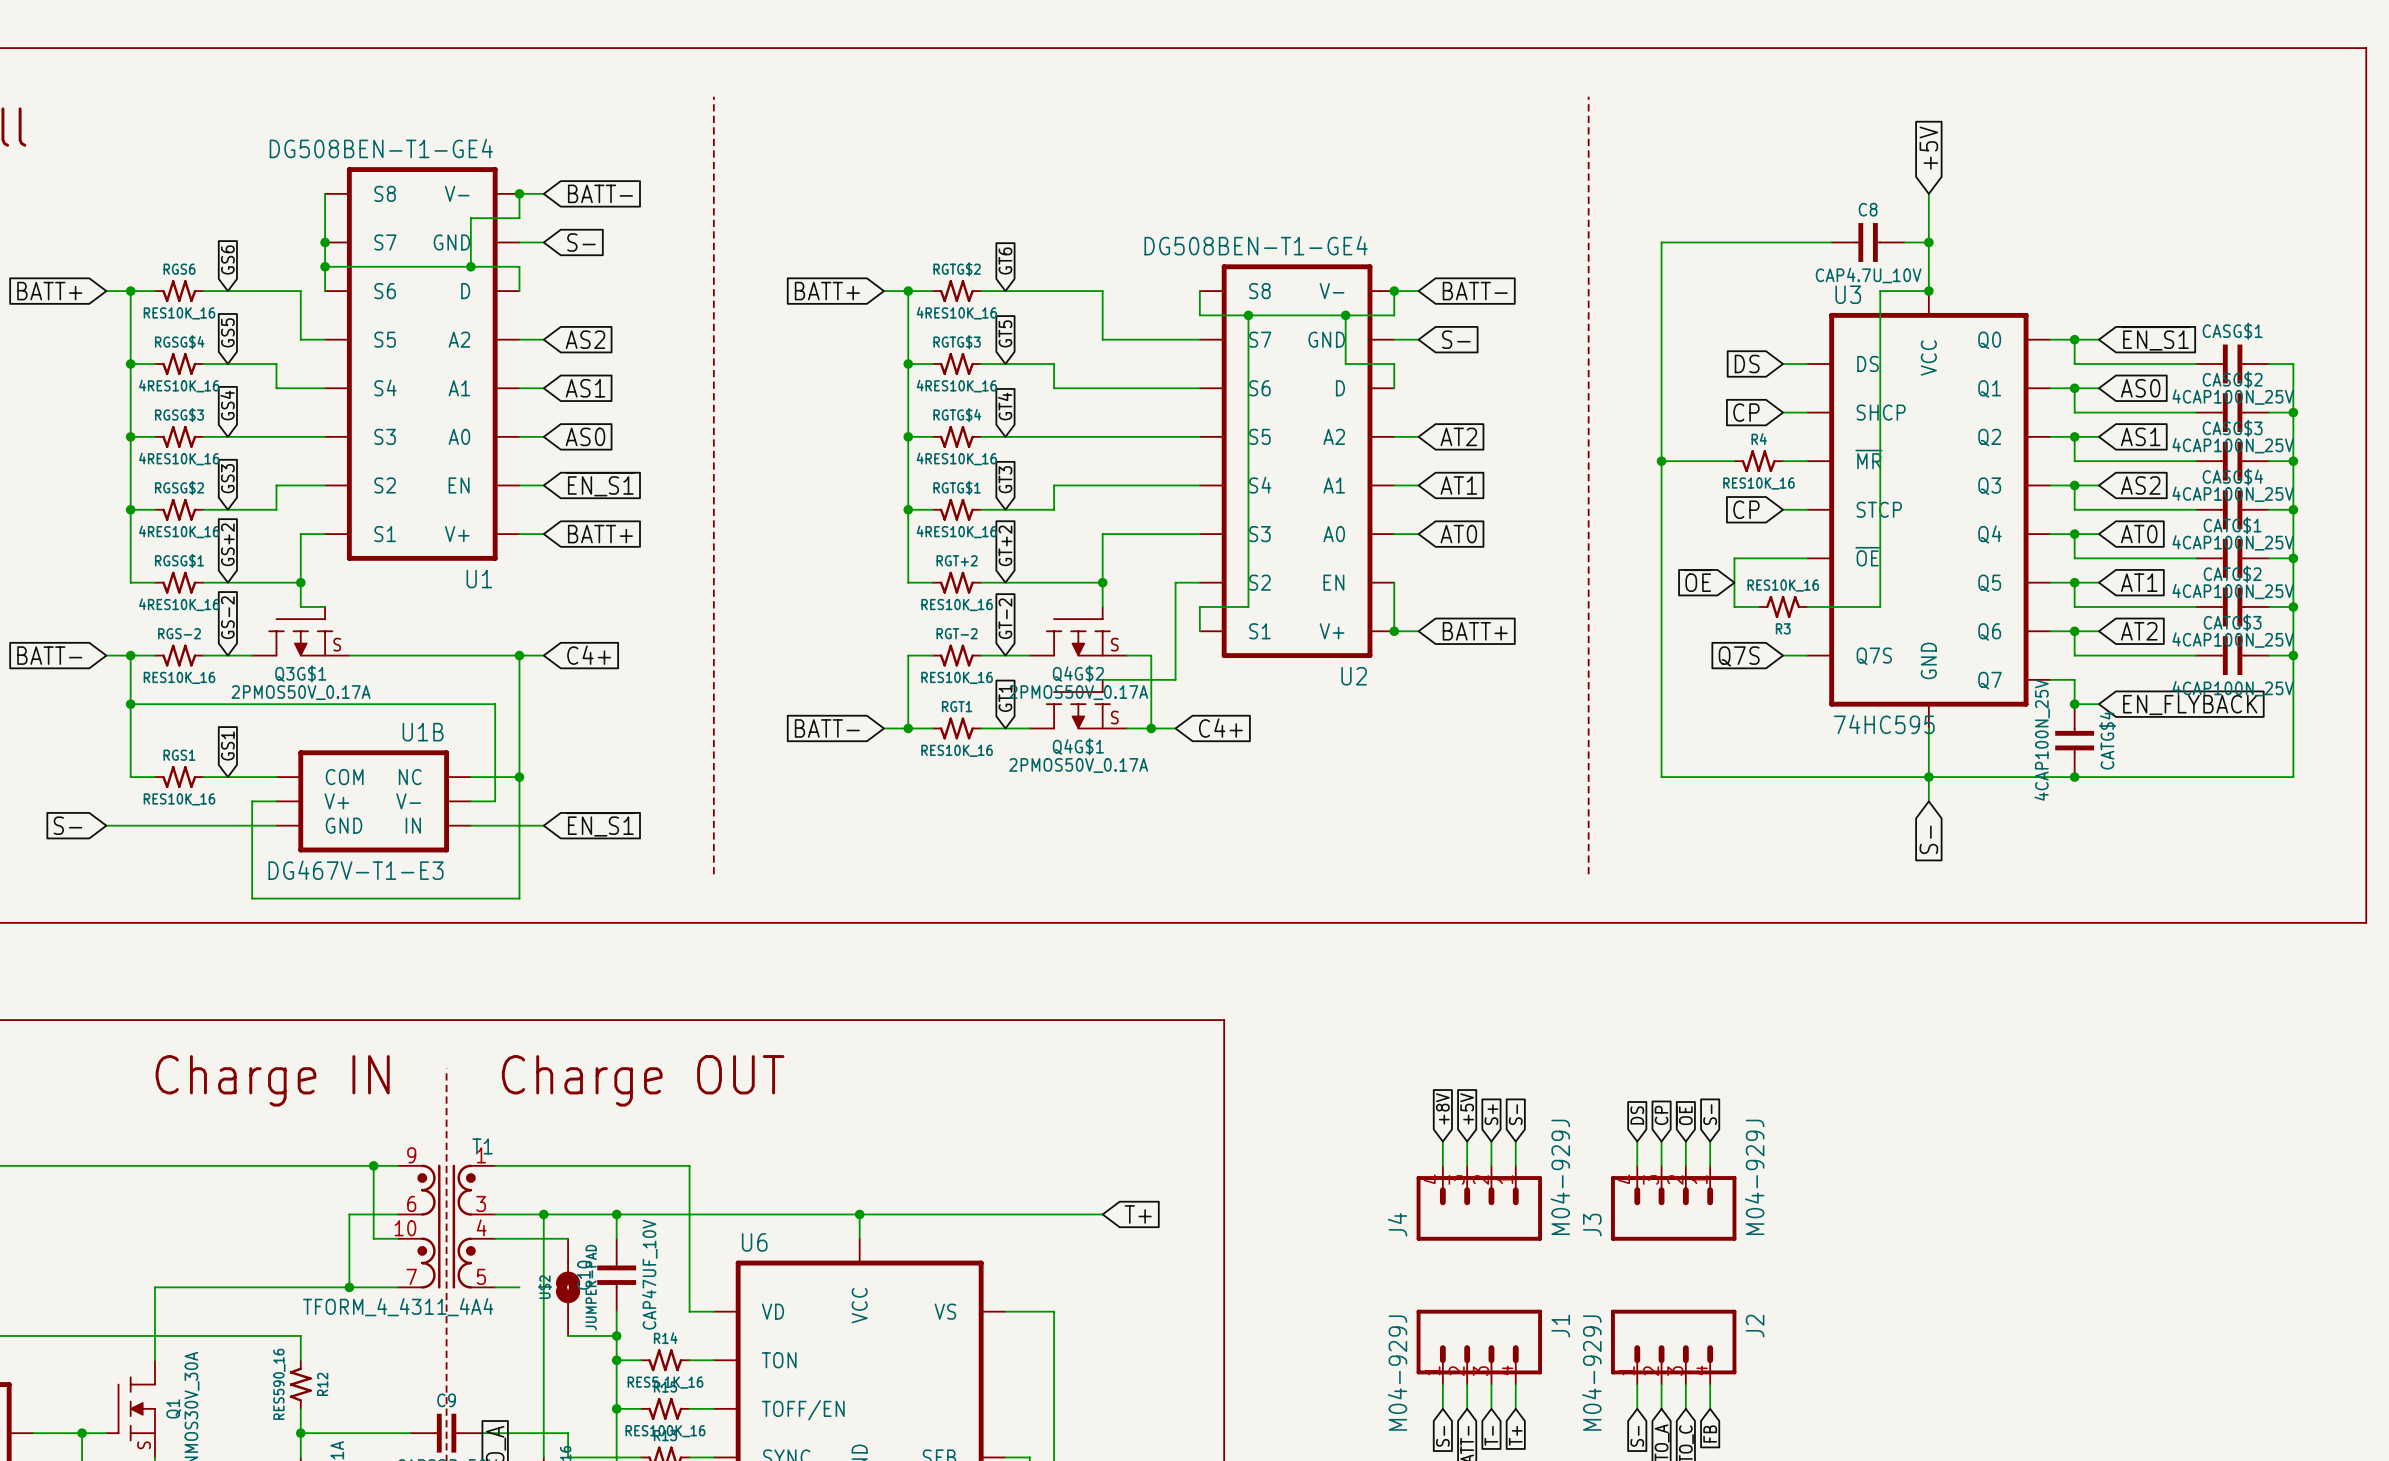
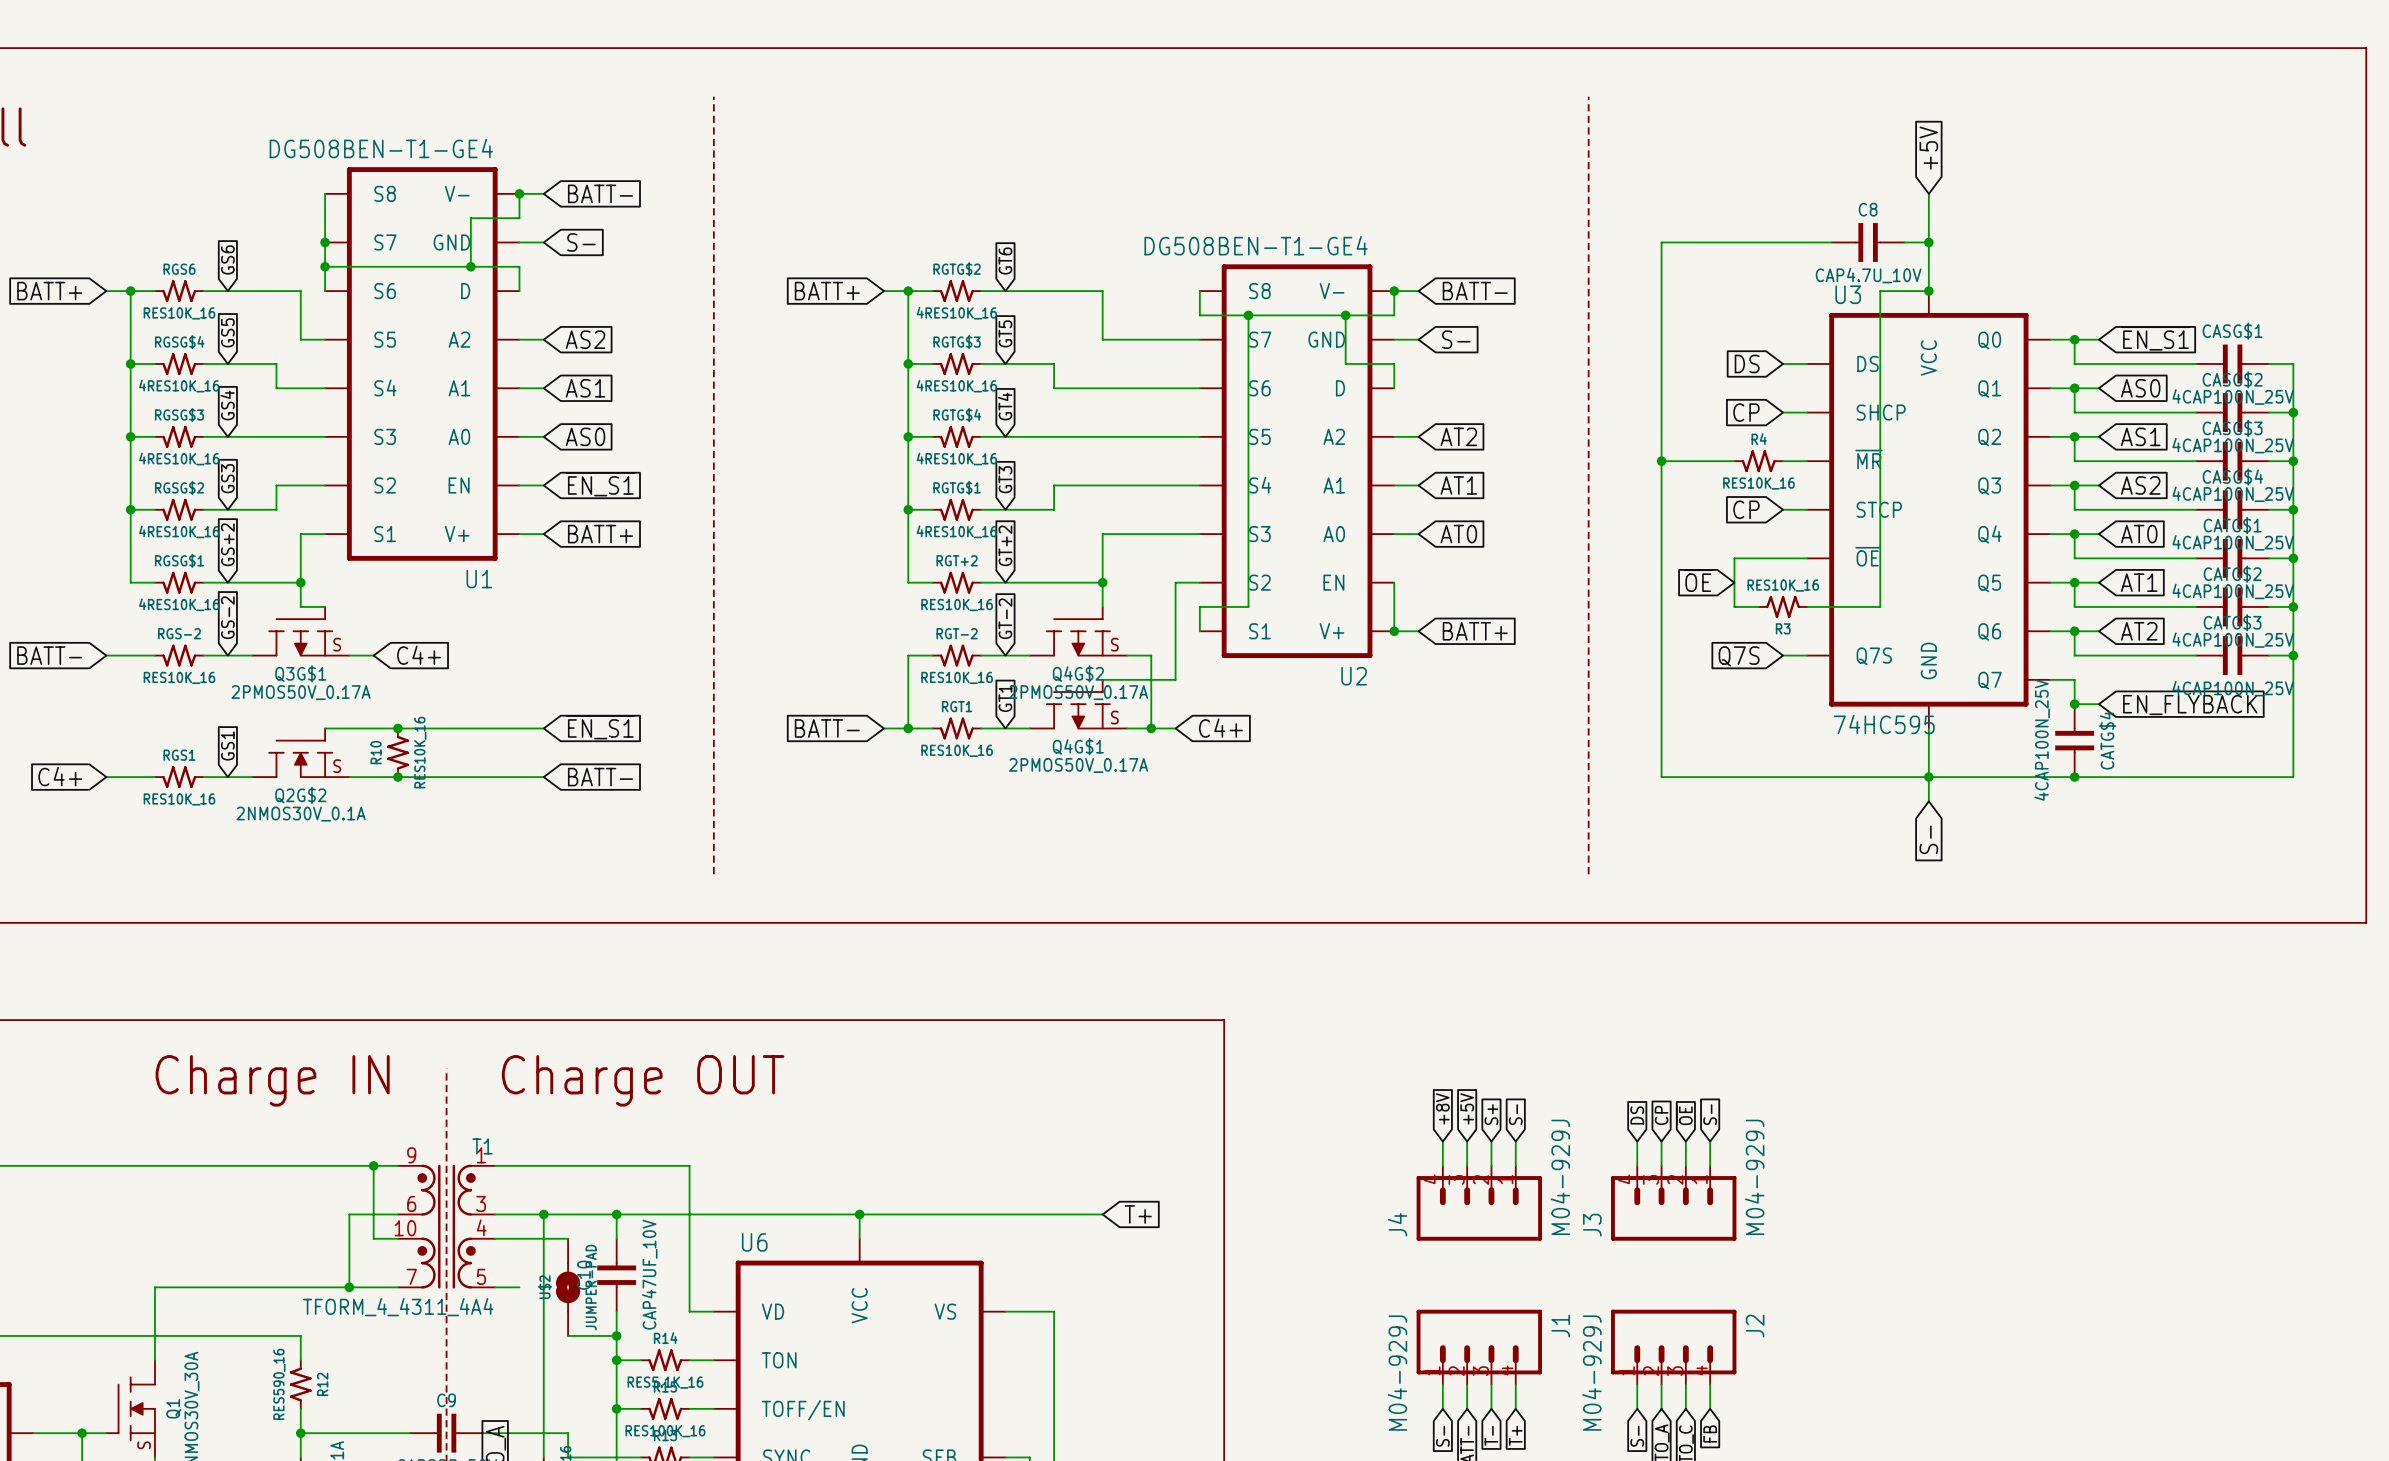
wire: (130, 655) (130, 777) -> (106, 777) (130, 777)
junction: (130, 655) -> none
wire: (373, 655) (543, 655) -> none
wire: (519, 655) (519, 898) (252, 898) (252, 801) (276, 801) -> none
junction: (519, 655) -> none
global label position: C4+ (589, 655) -> C4+ (419, 655)
wire: (130, 704) (495, 704) (495, 801) (470, 801) -> none
junction: (130, 704) -> none
wire: none -> (325, 728) (543, 728)
junction: none -> (397, 728)
Q2G$2: none -> 2NMOS30V_0.1A (300, 752)
R10: none -> RES10K_16 (397, 752)
global label: none -> C4+ (60, 776)
wire: none -> (349, 777) (470, 777)
junction: none -> (397, 777)
wire: none -> (519, 777) (543, 777)
junction: (519, 777) -> none
global label: none -> BATT- (600, 777)
U1B: DG467V-T1-E3 (373, 801) -> none
global label position: ~{EN_S1} (600, 824) -> ~{EN_S1} (600, 727)
global label: S- (67, 825) -> none
wire: (106, 825) (276, 825) -> none
wire: (470, 825) (543, 825) -> none

